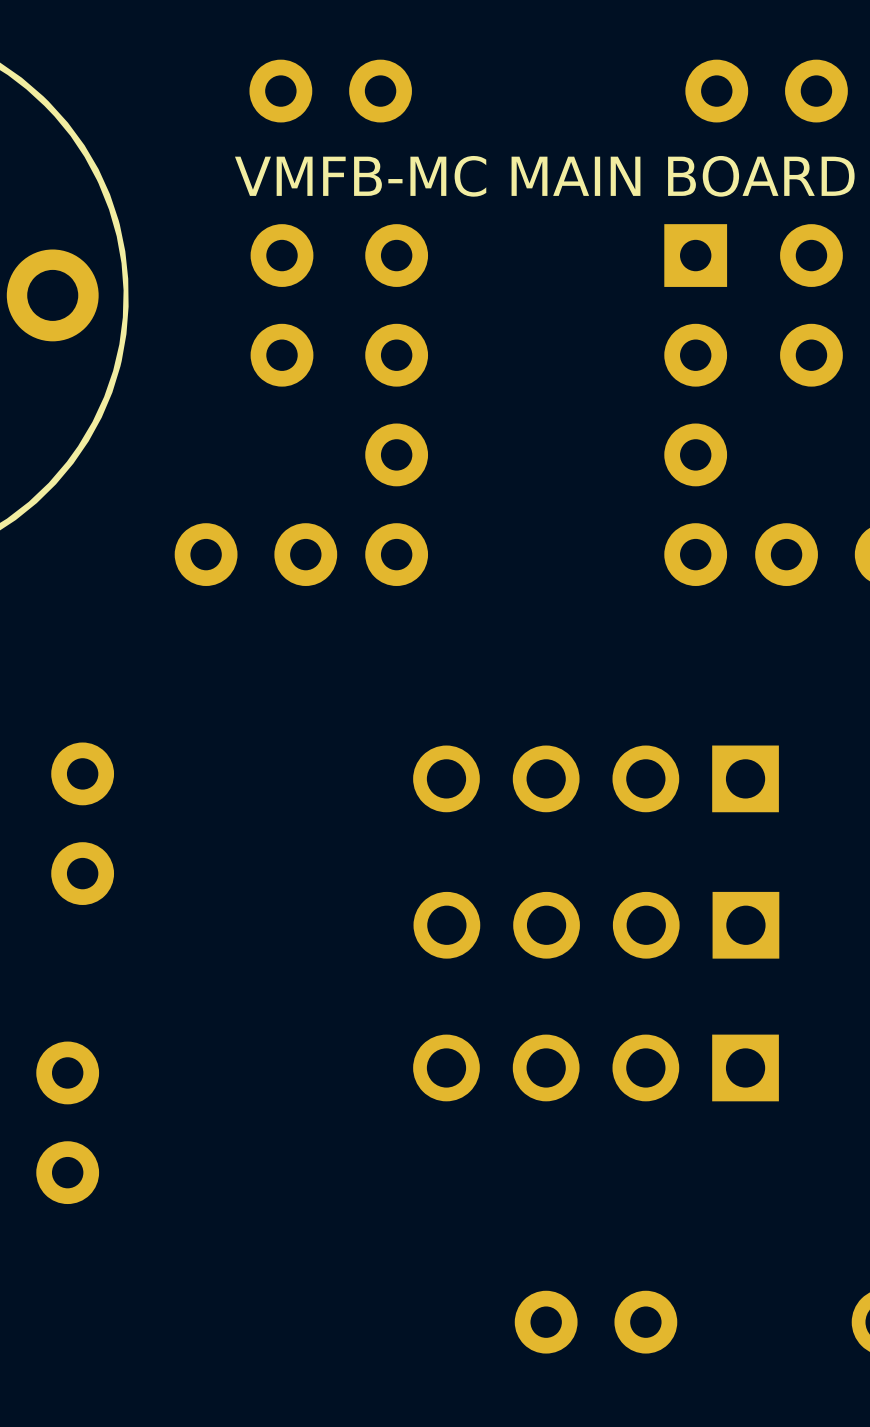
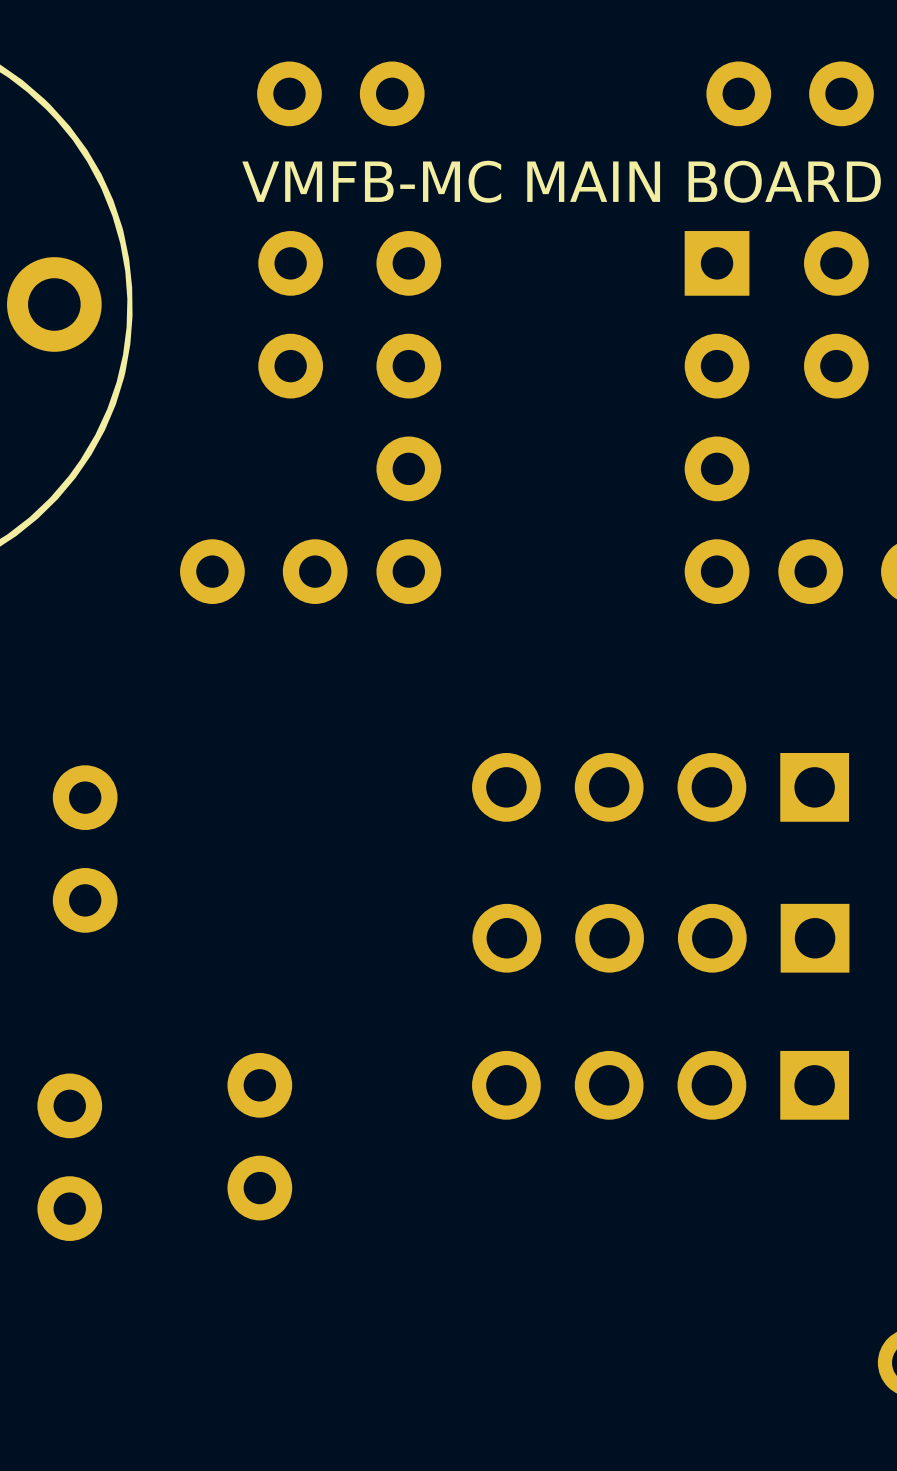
part position: (596, 778) -> (660, 787)
part position: (596, 925) -> (660, 938)
part position: (596, 1067) -> (660, 1085)
part rotation: 0° (596, 1322) -> 90° clockwise (259, 1136)
part position: (596, 1322) -> (259, 1136)

